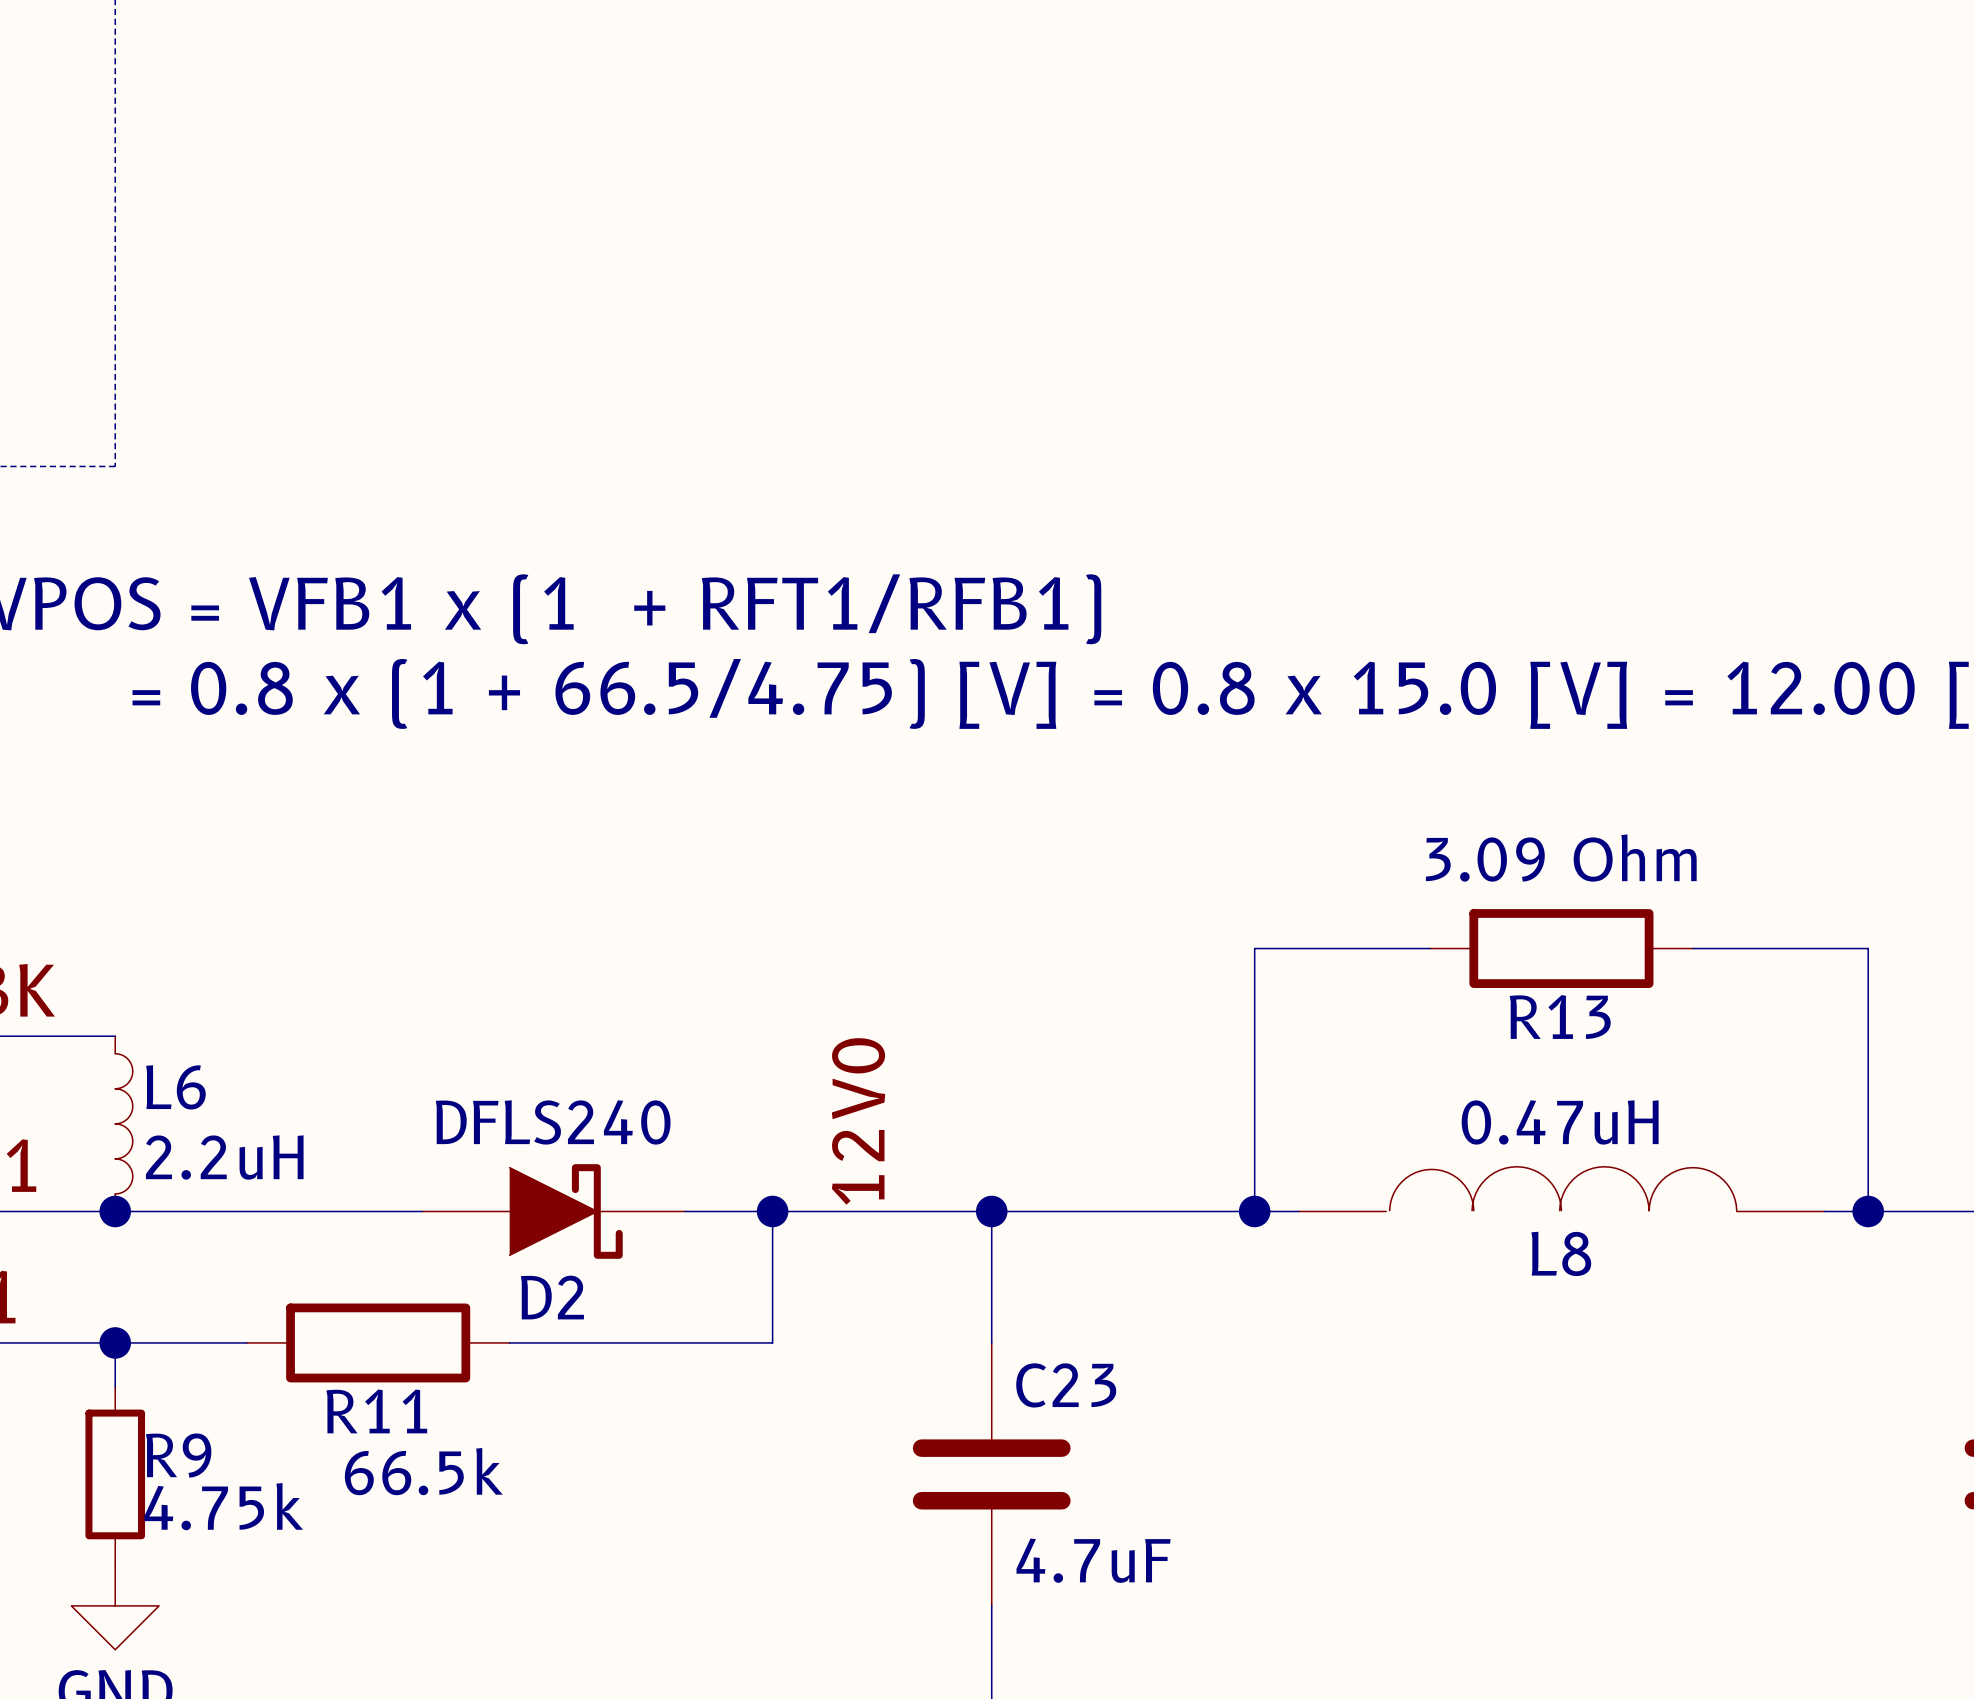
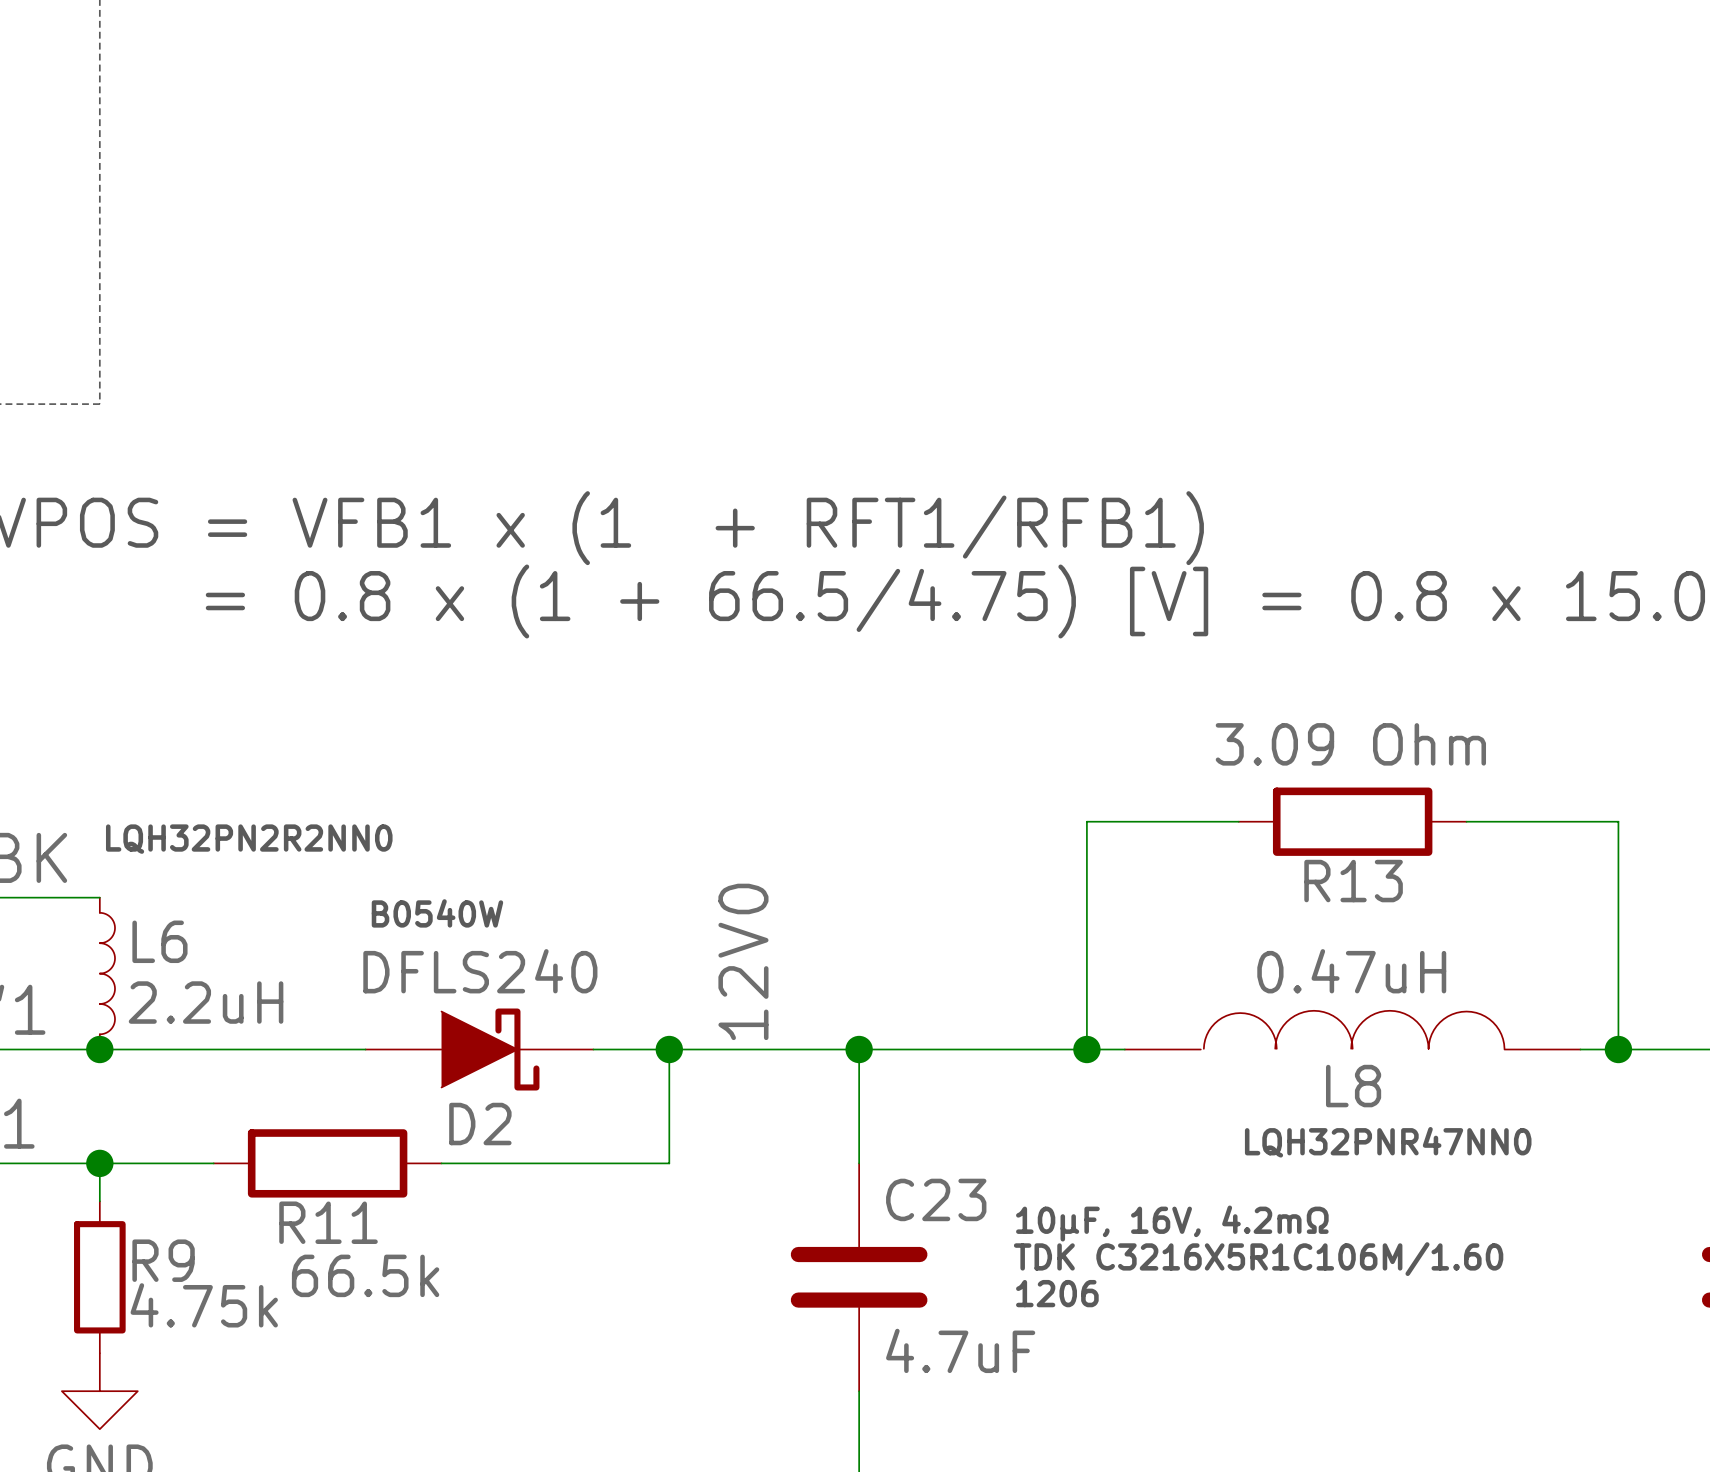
text: none -> LQH32PN2R2NN0 (249, 839)
text: none -> B0540W (437, 913)
text: none -> LQH32PNR47NN0 (1388, 1142)
text: none -> 10µF, 16V, 4.2mΩ (1172, 1223)
text: none -> TDK C3216X5R1C106M/1.60 (1258, 1259)
text: none -> 1206 (1057, 1293)

